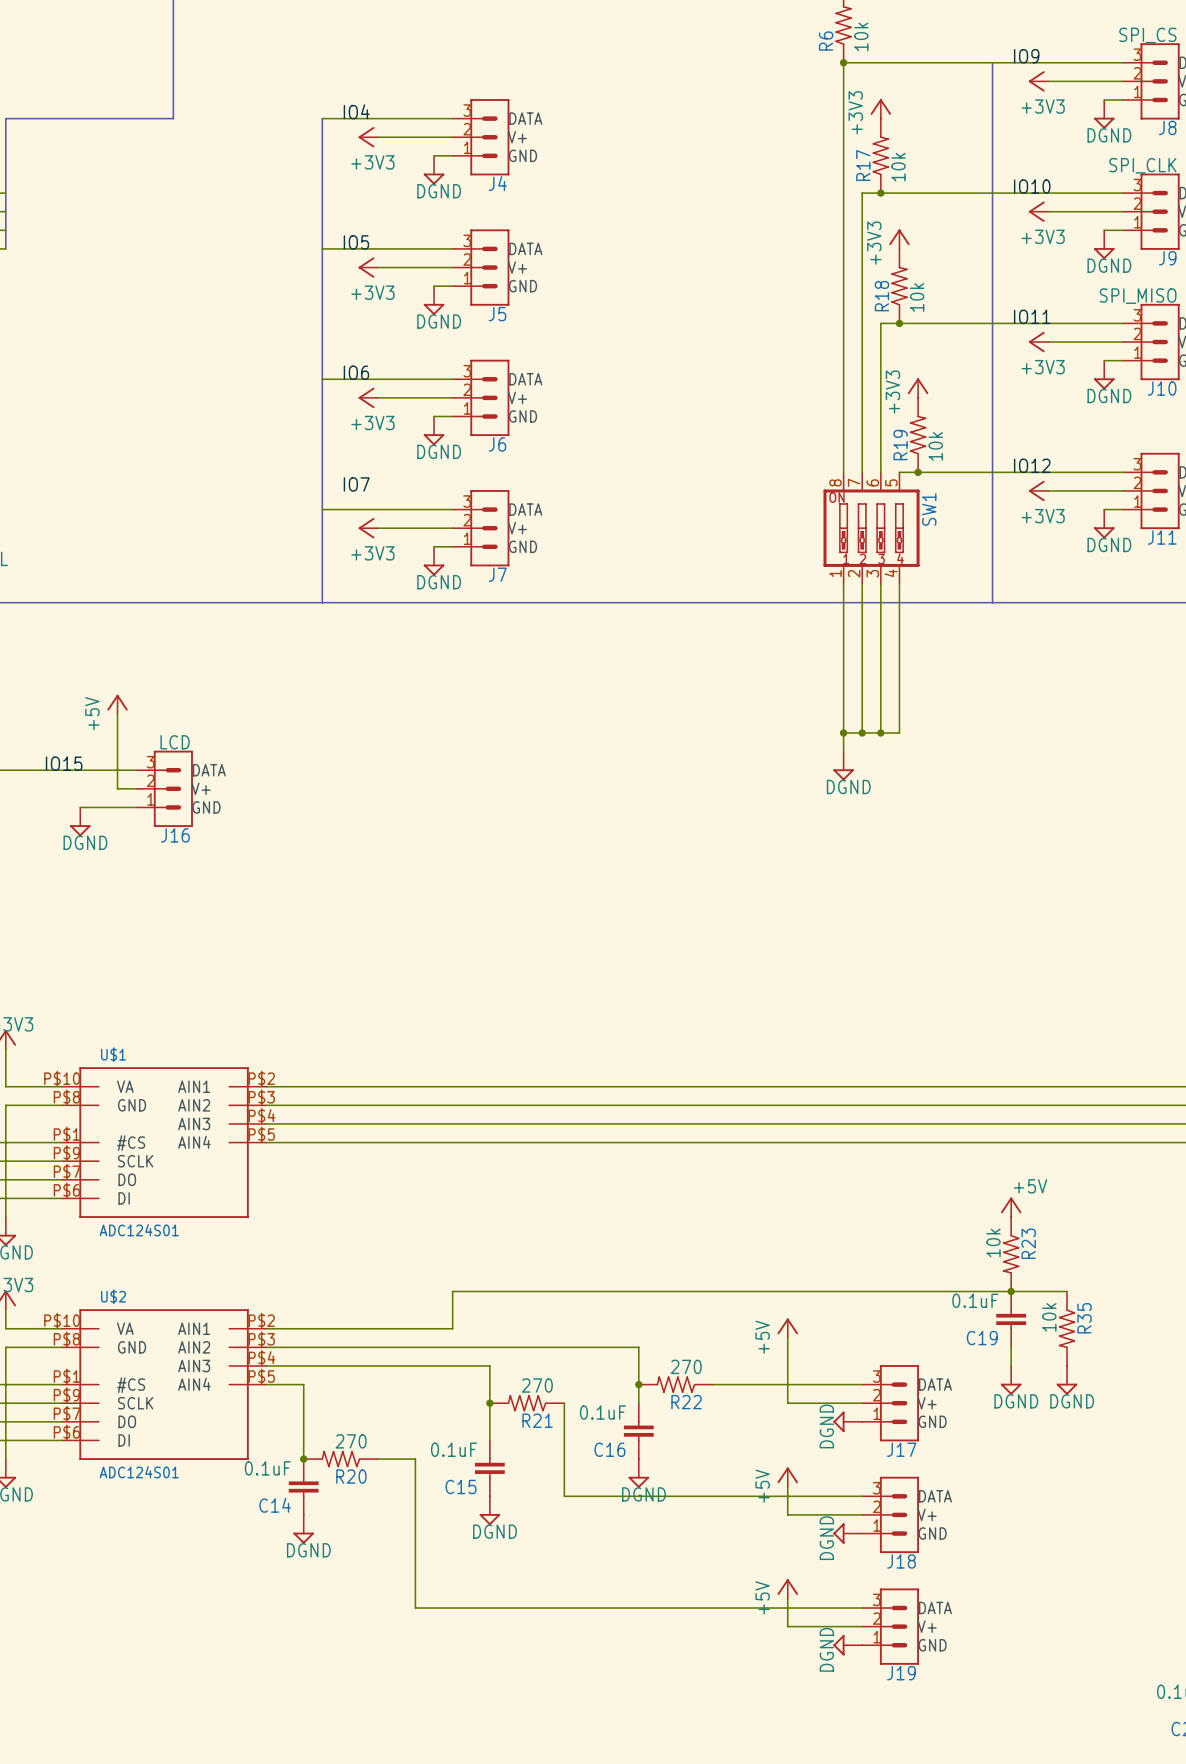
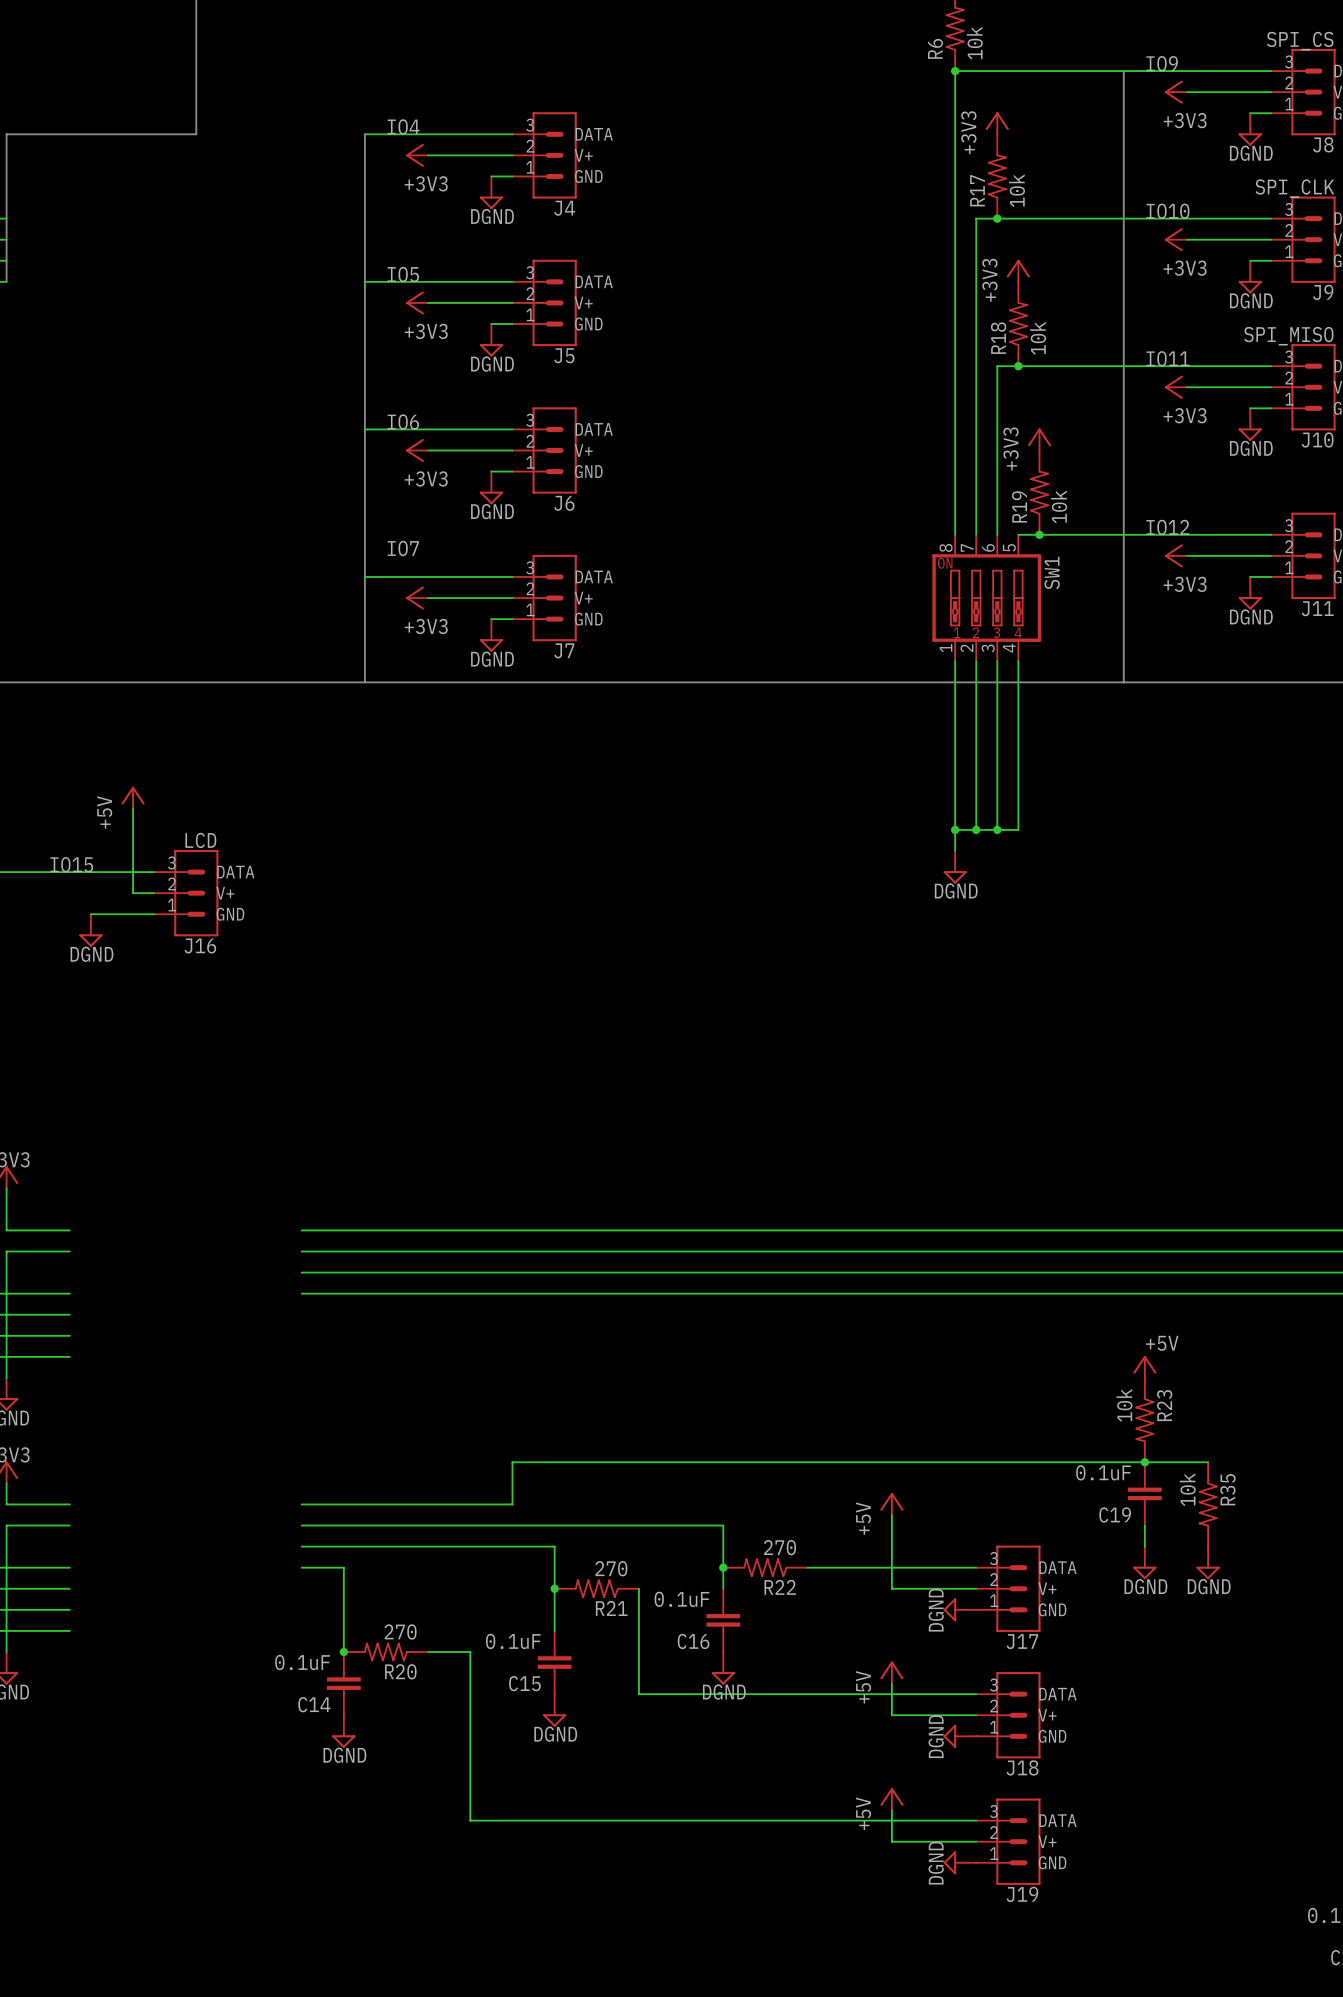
U$1: ADC124S01 (164, 1142) -> none
U$2: ADC124S01 (164, 1384) -> none

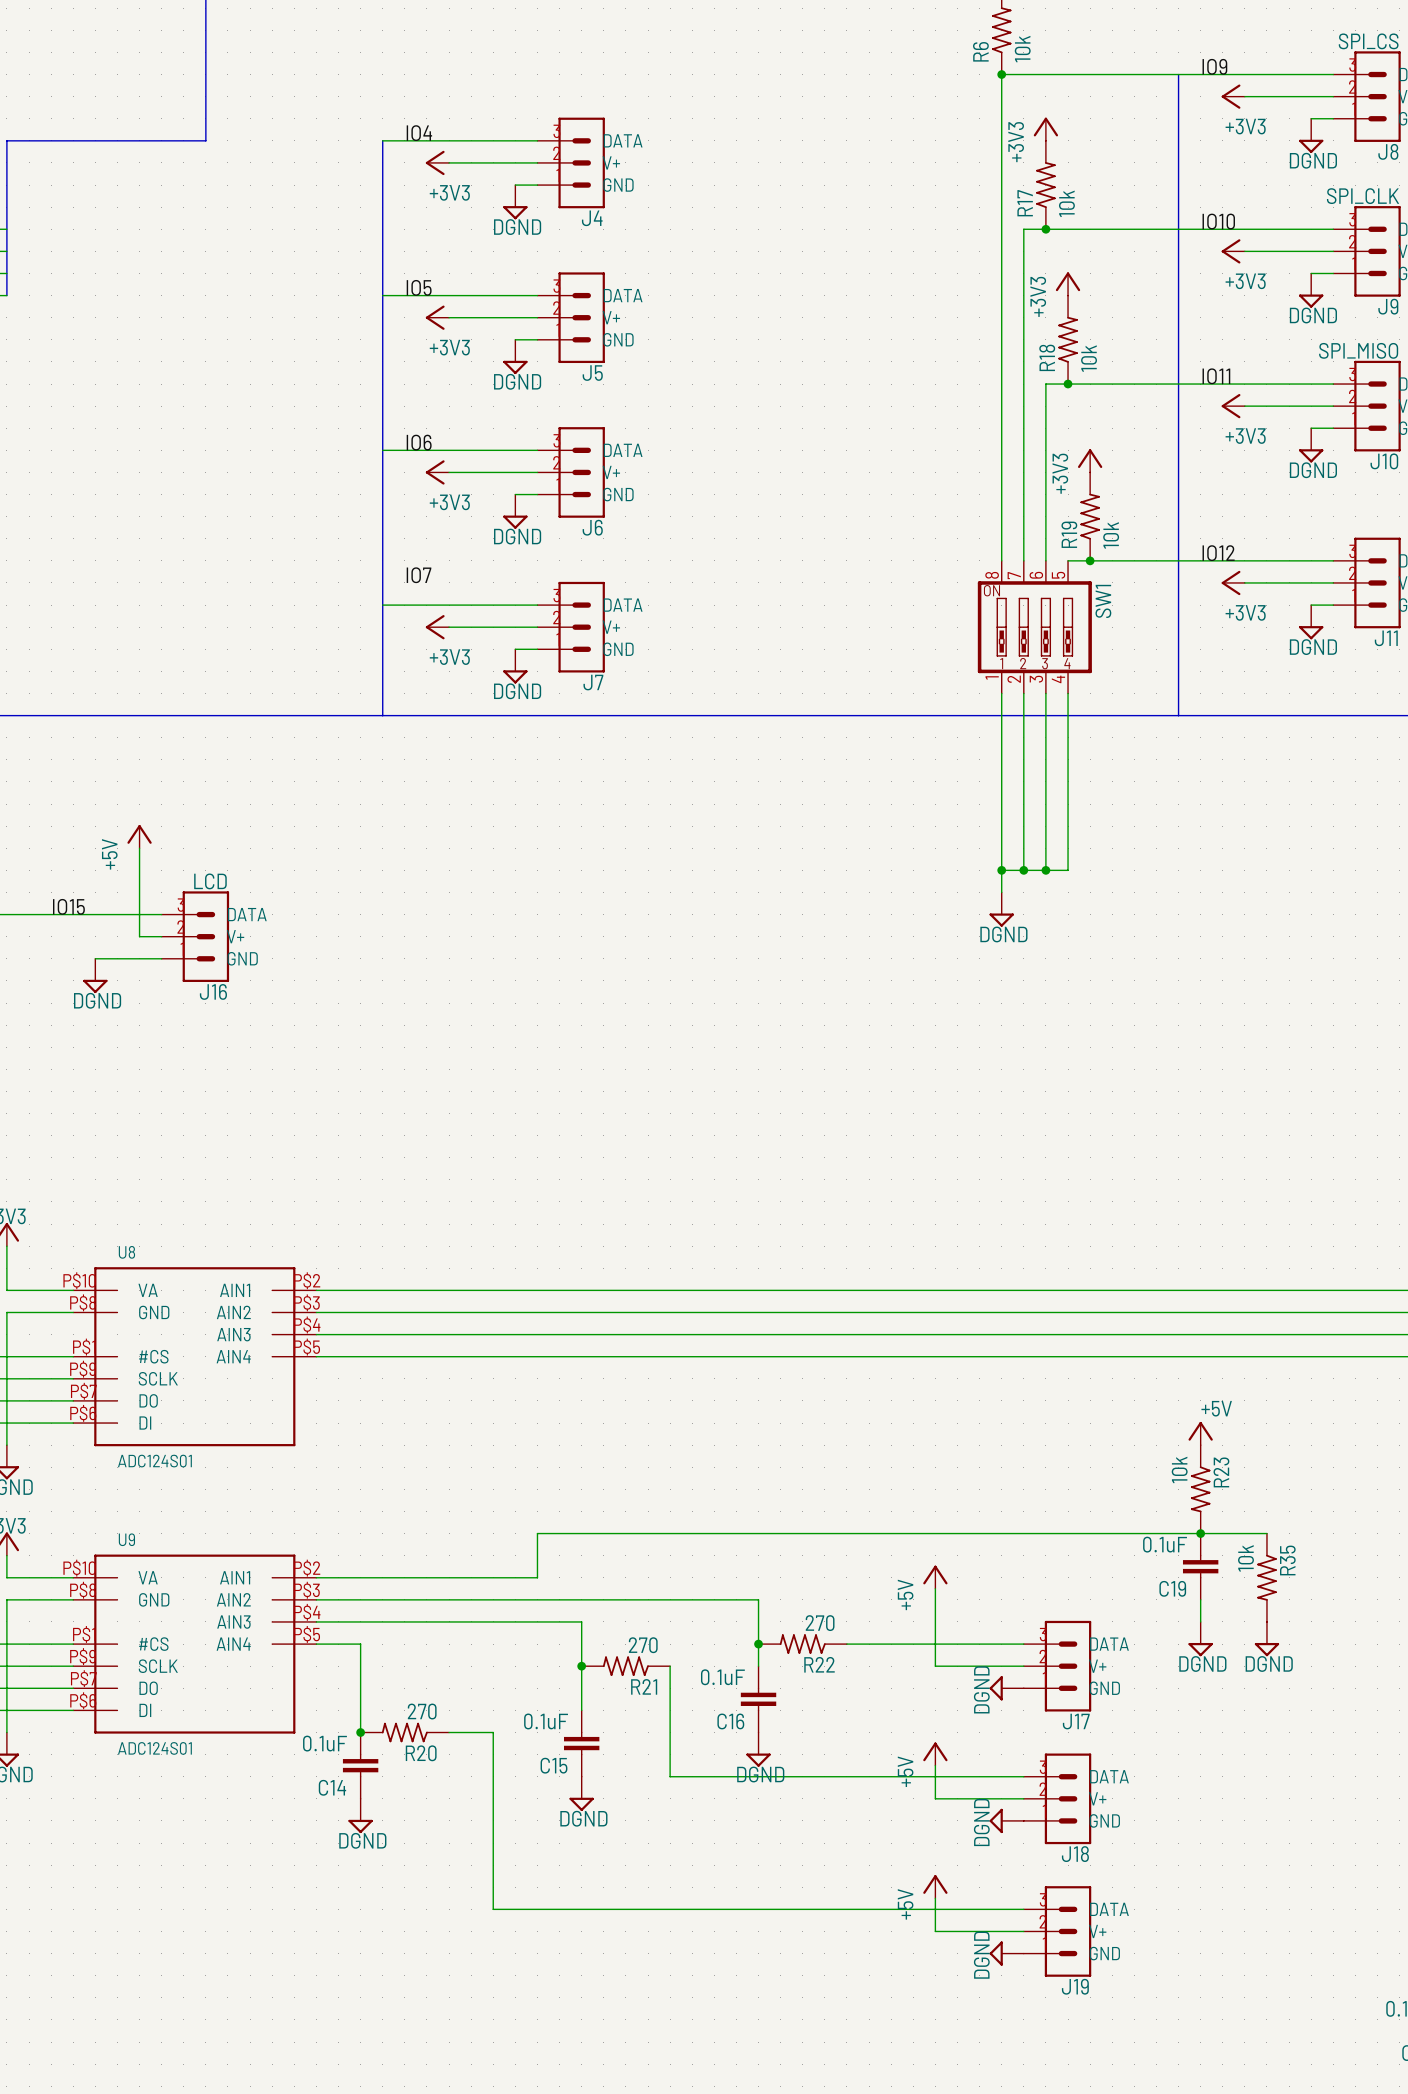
U8: none -> ADC124S01 (194, 1356)
U9: none -> ADC124S01 (194, 1644)

